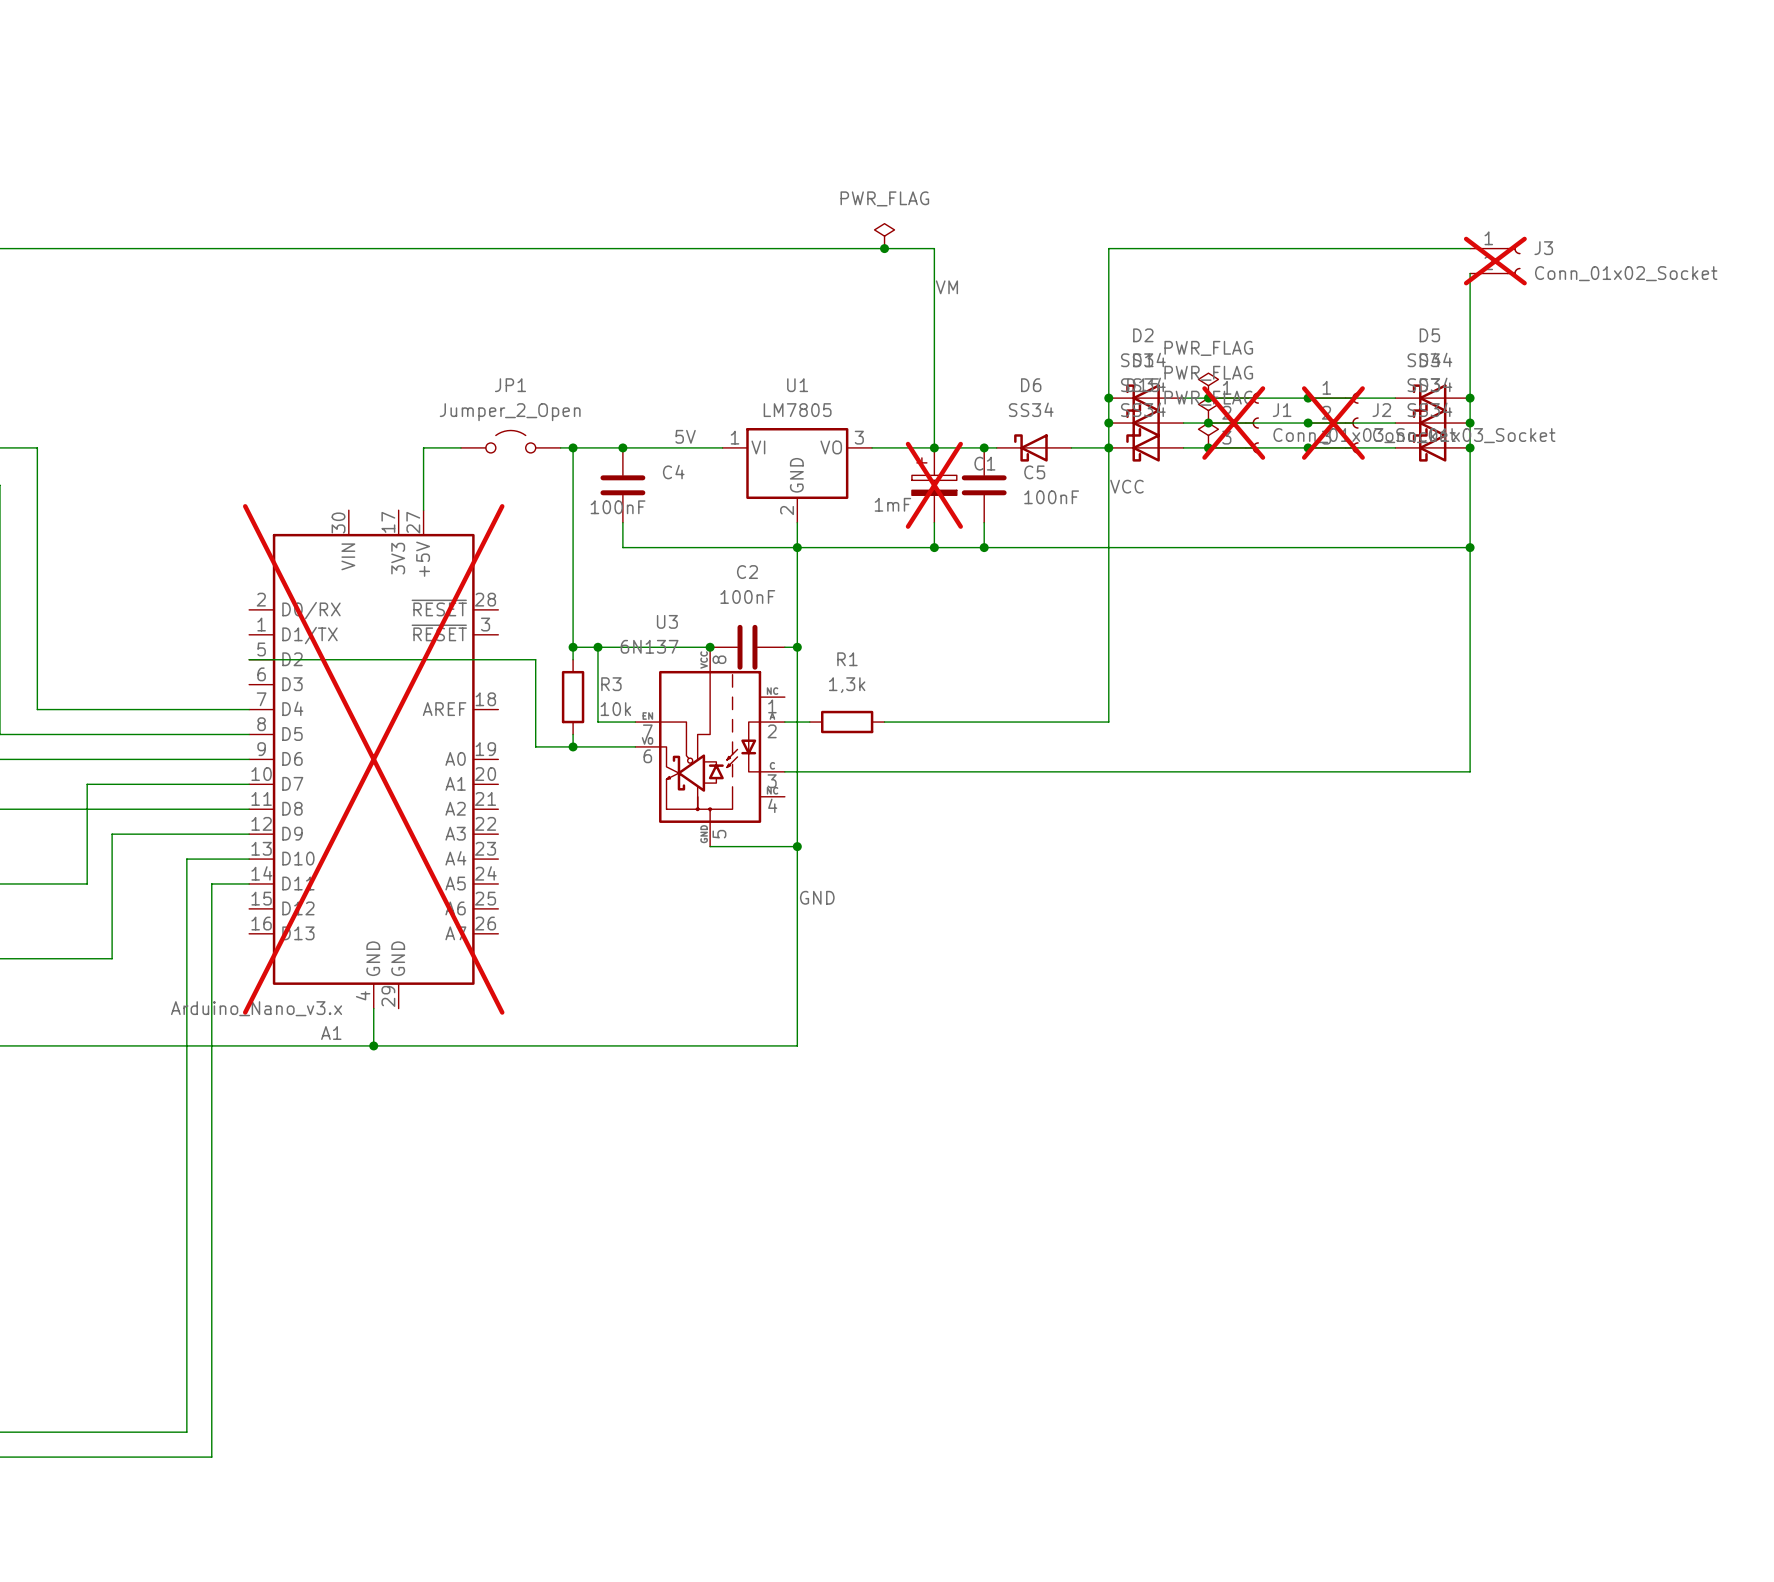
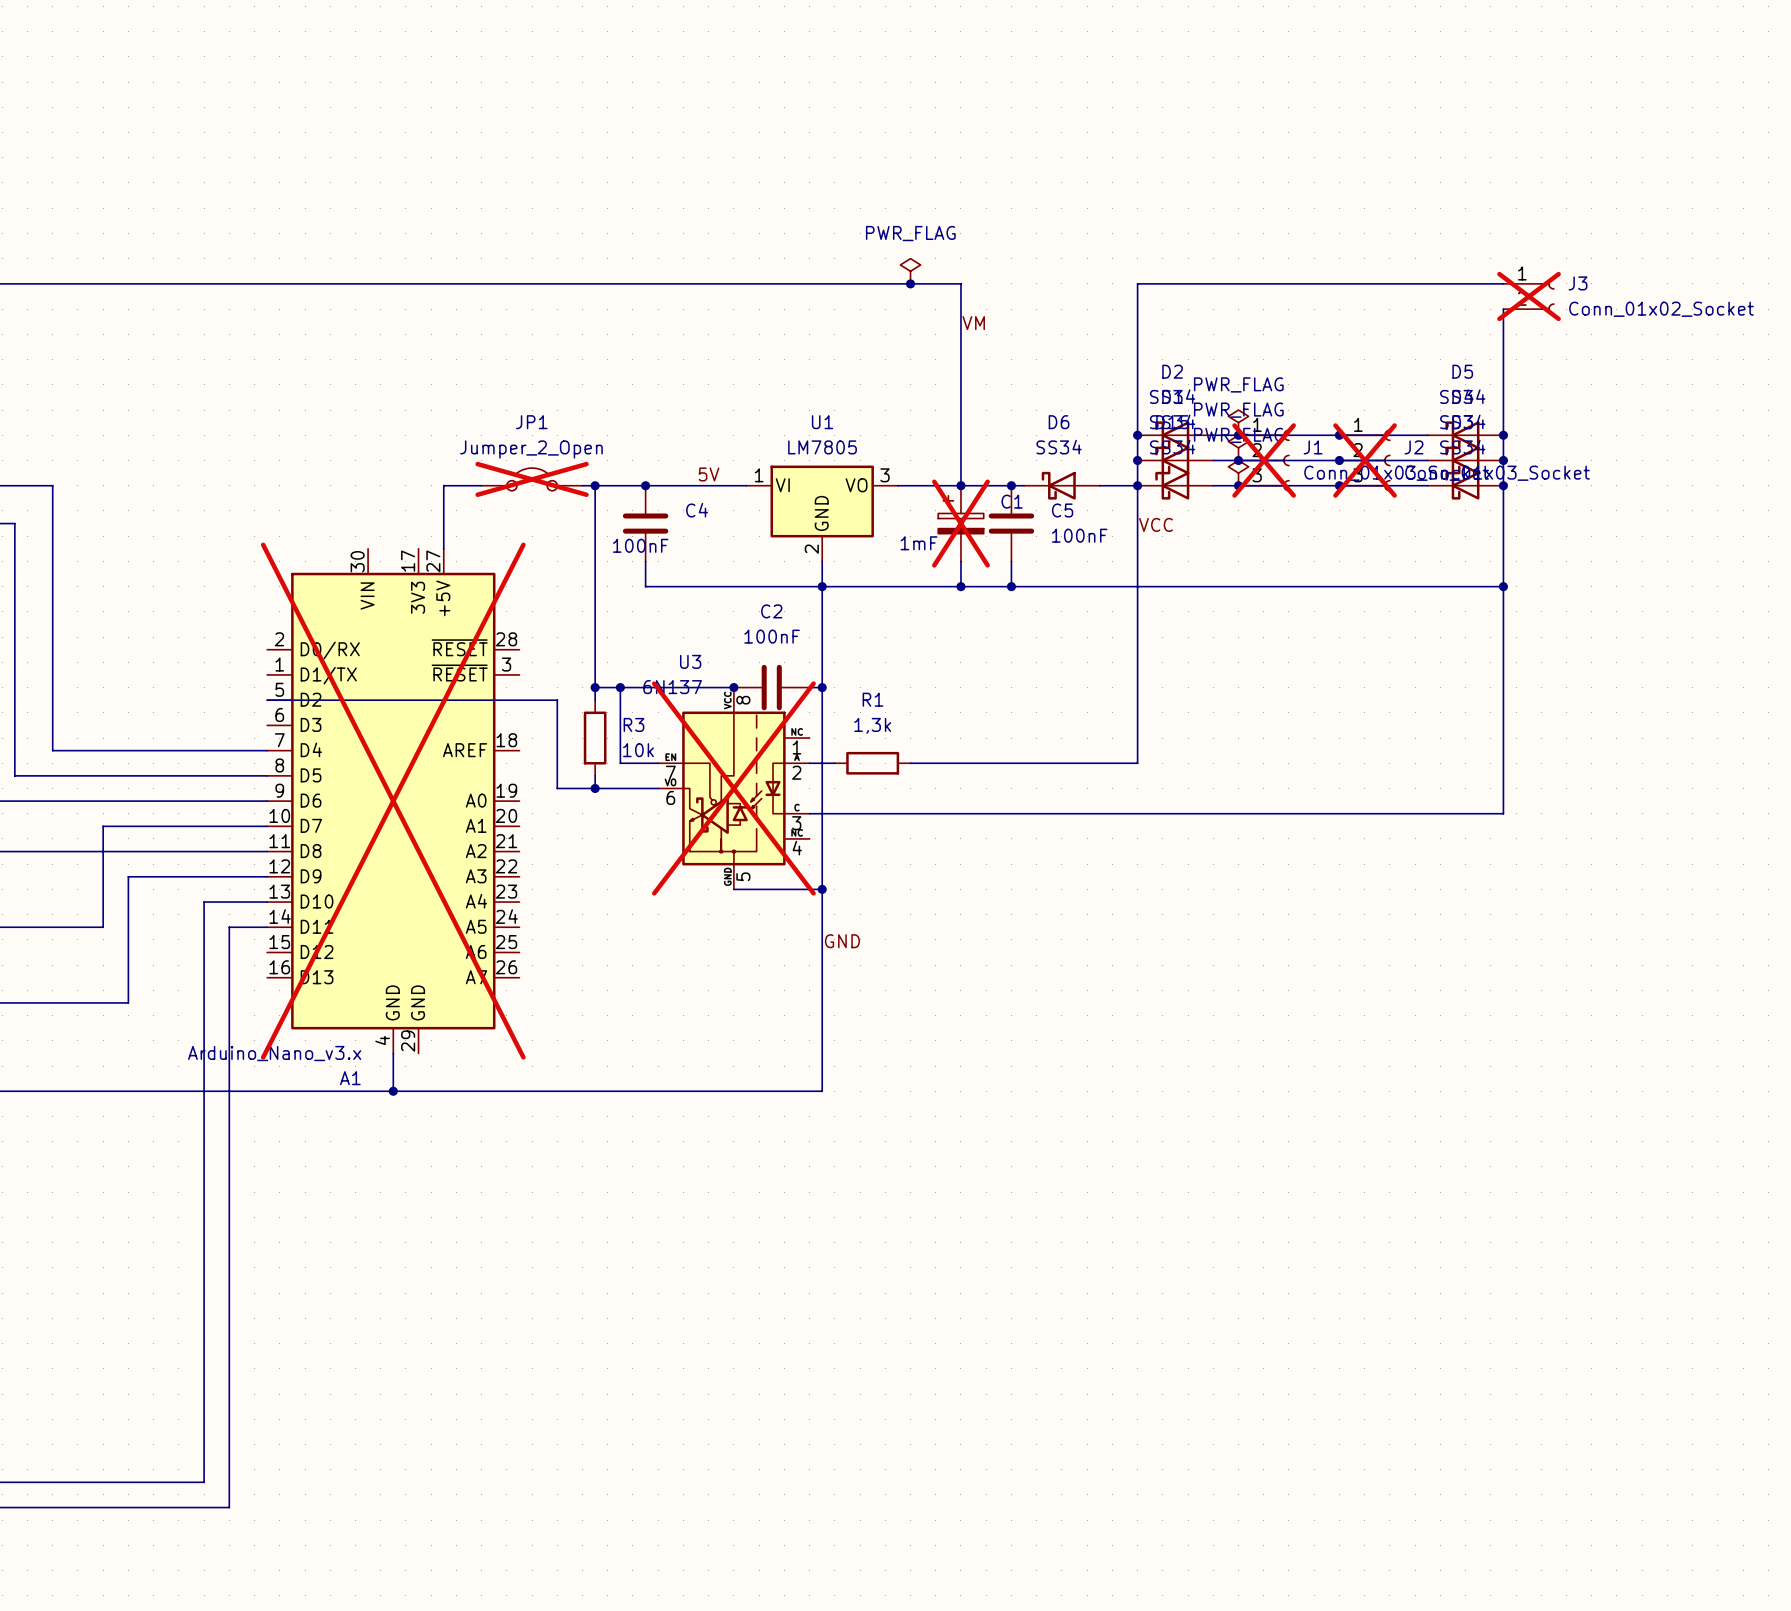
JP1 do-not-place cross: none -> (532, 479)
U3 do-not-place cross: none -> (733, 788)

